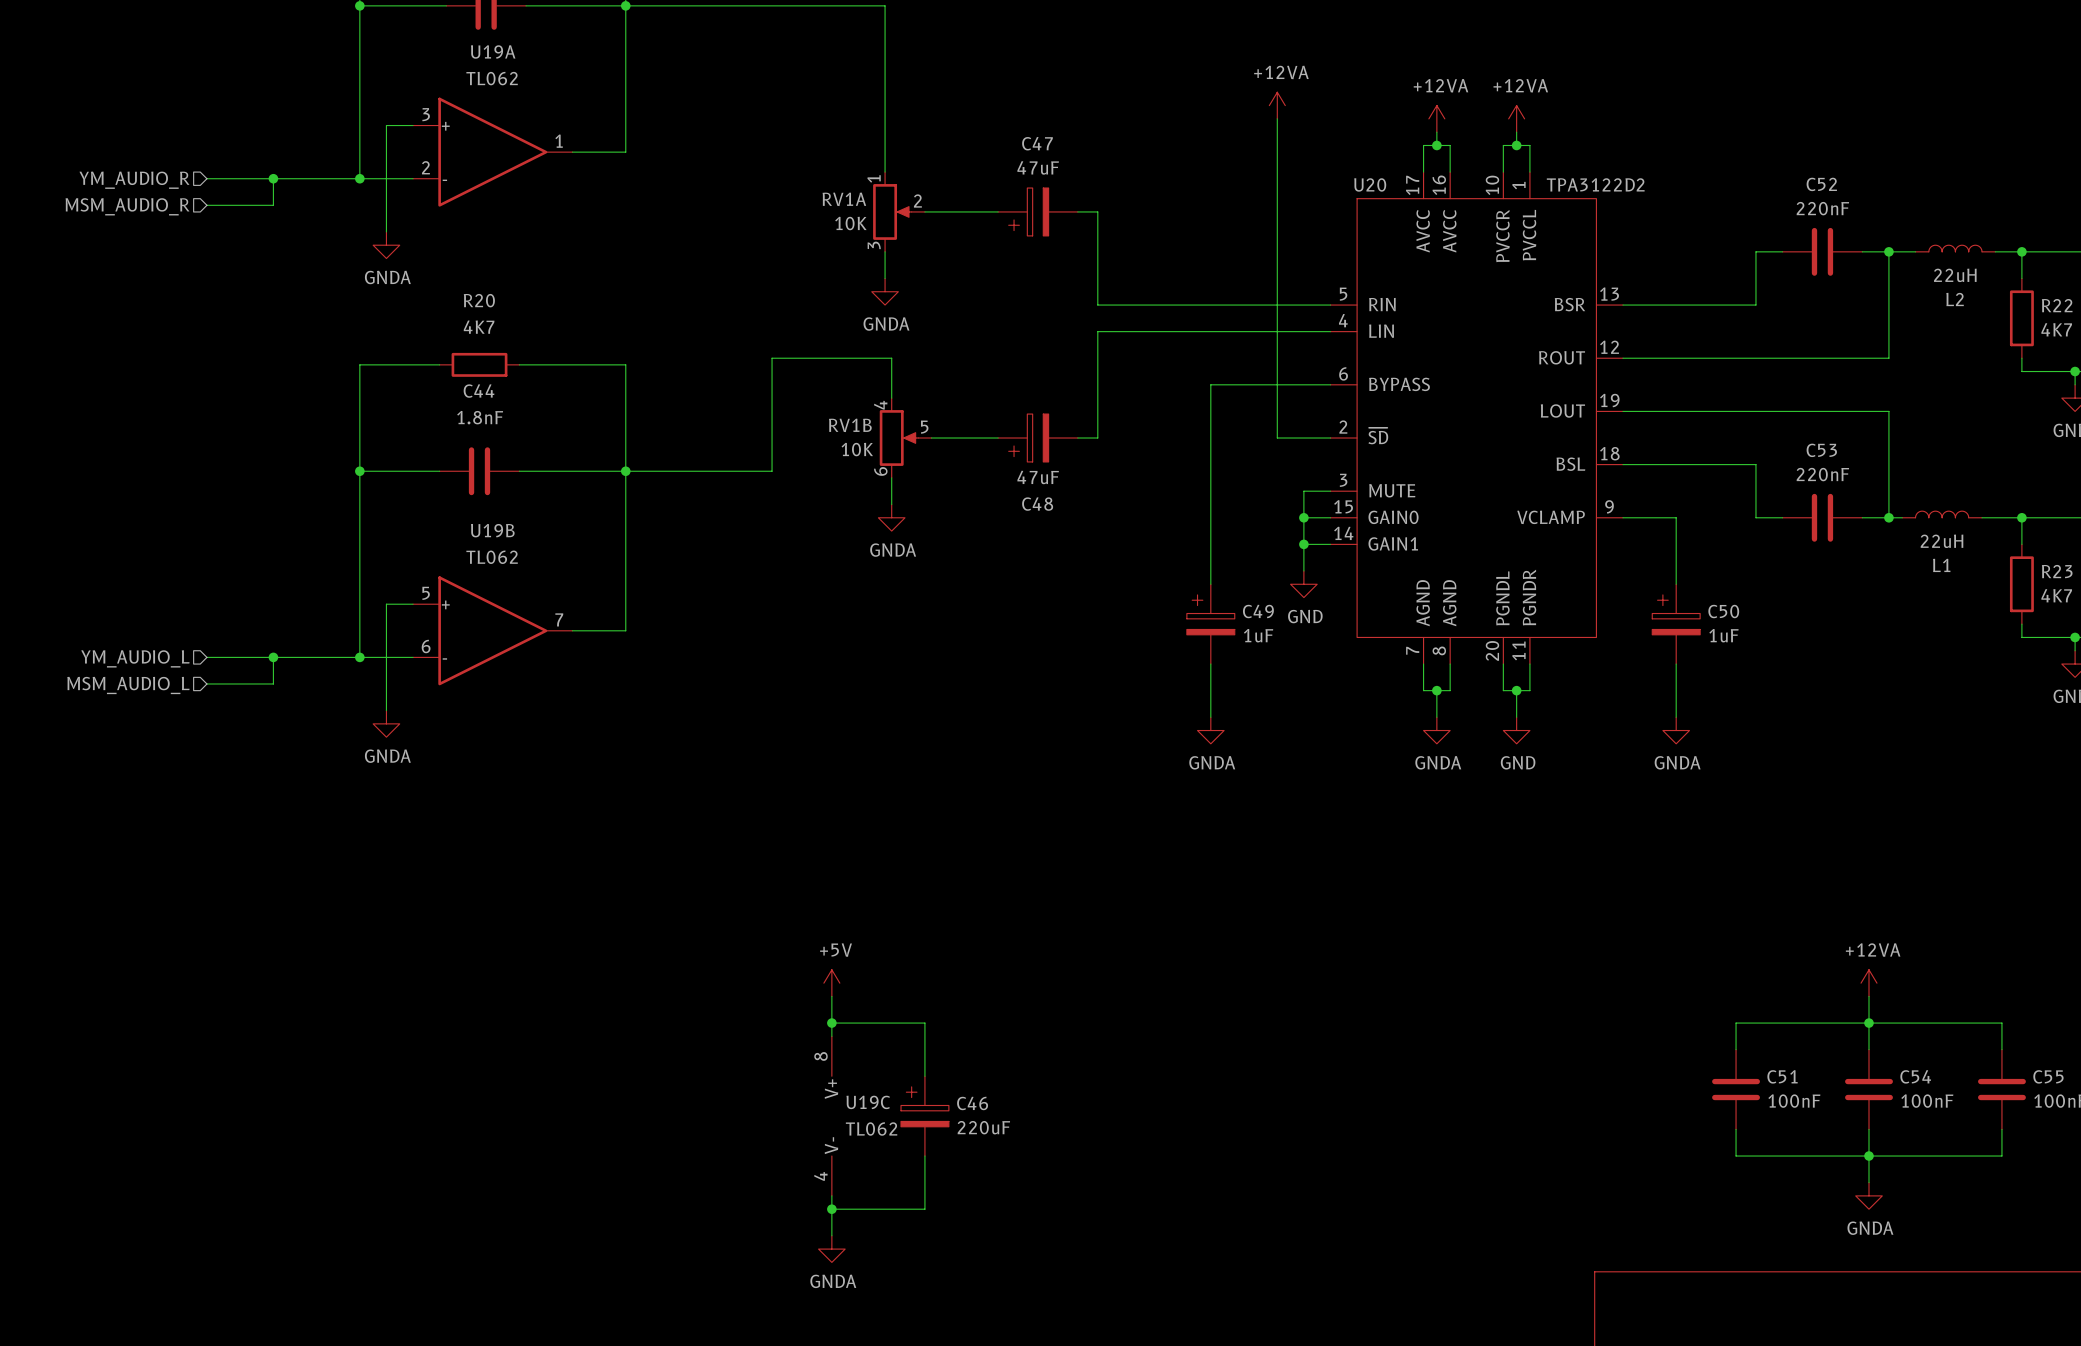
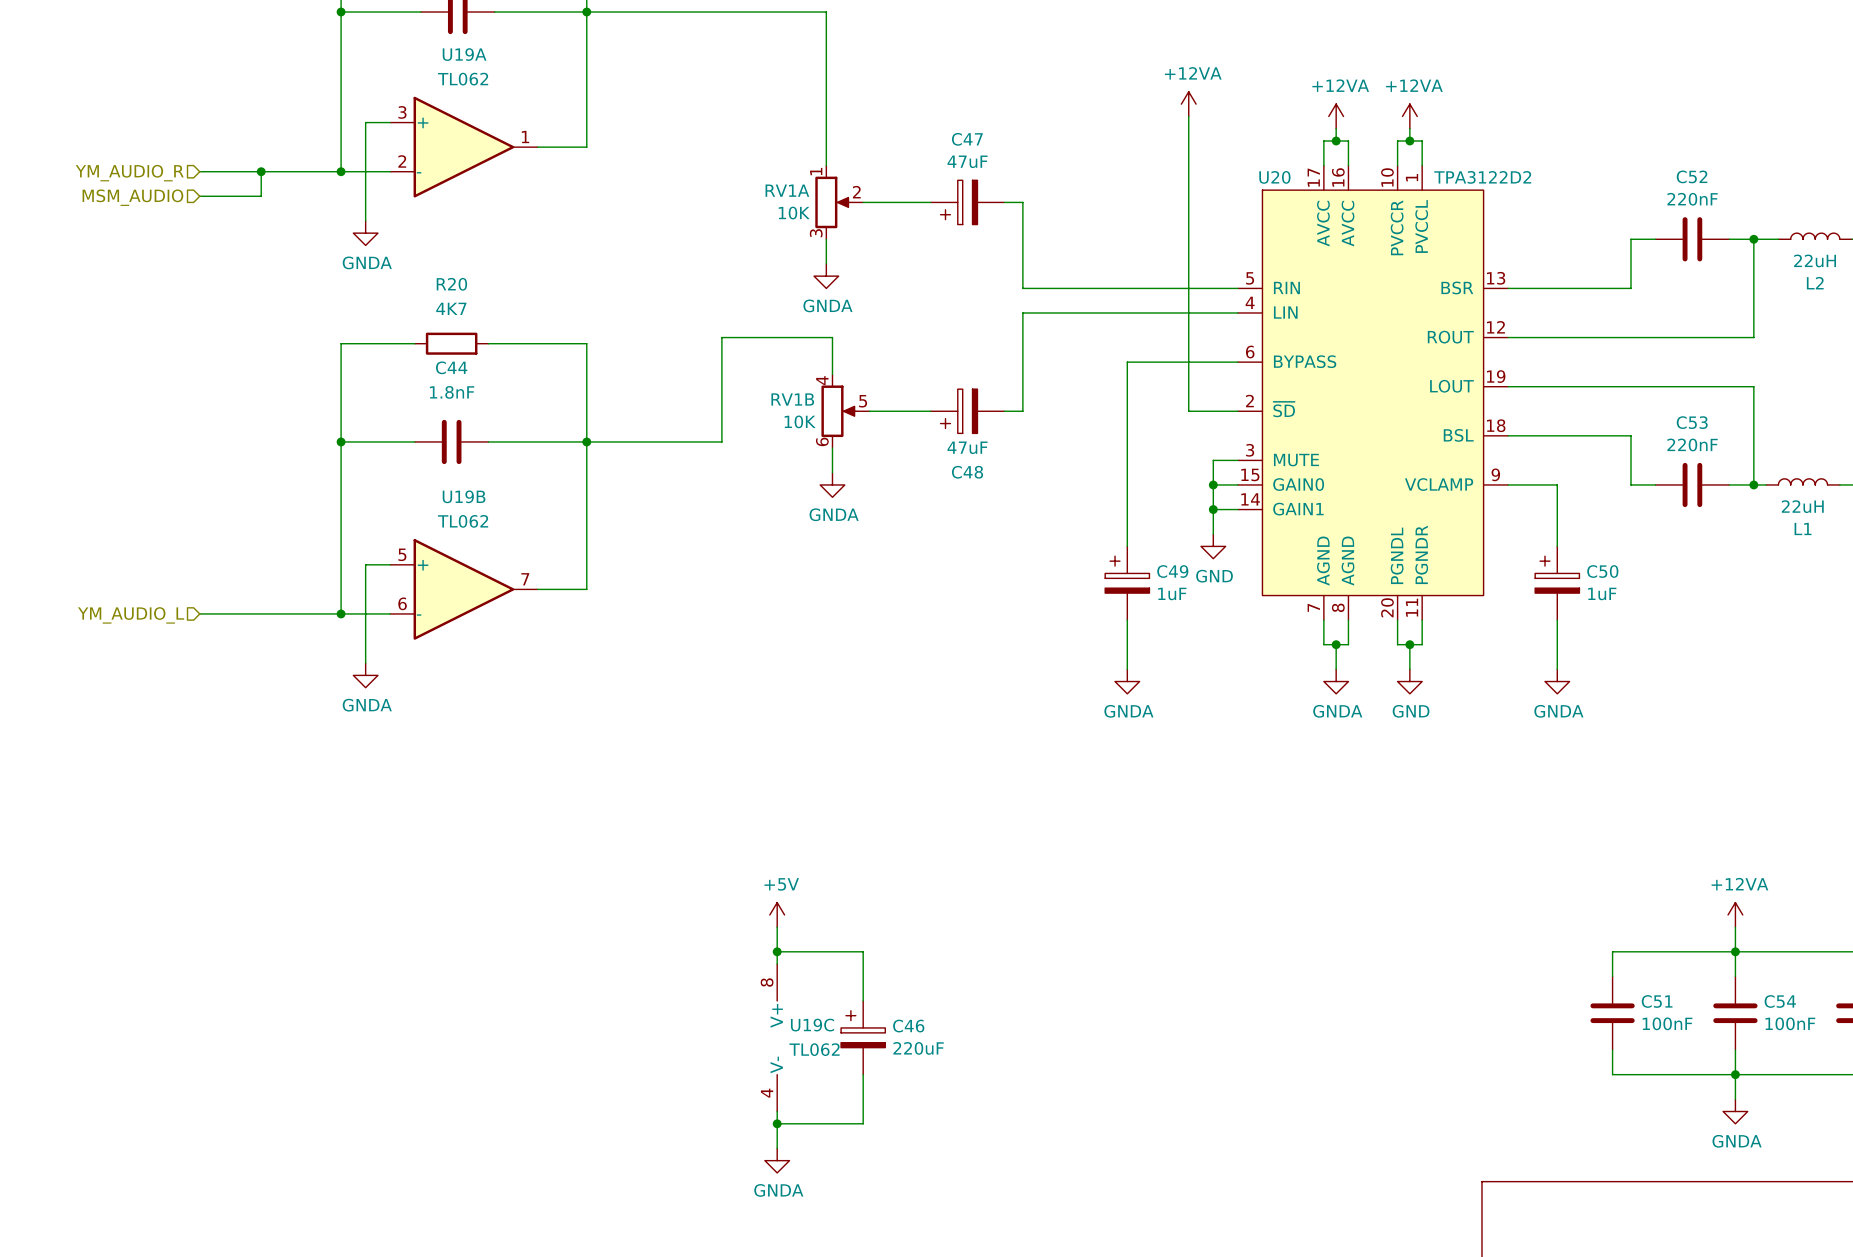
hierarchical label: MSM_AUDIO_R (127, 206) -> MSM_AUDIO (132, 197)
wire: (273, 657) (273, 683) (206, 683) -> none
junction: (273, 657) -> none
hierarchical label: MSM_AUDIO_L (128, 685) -> none

